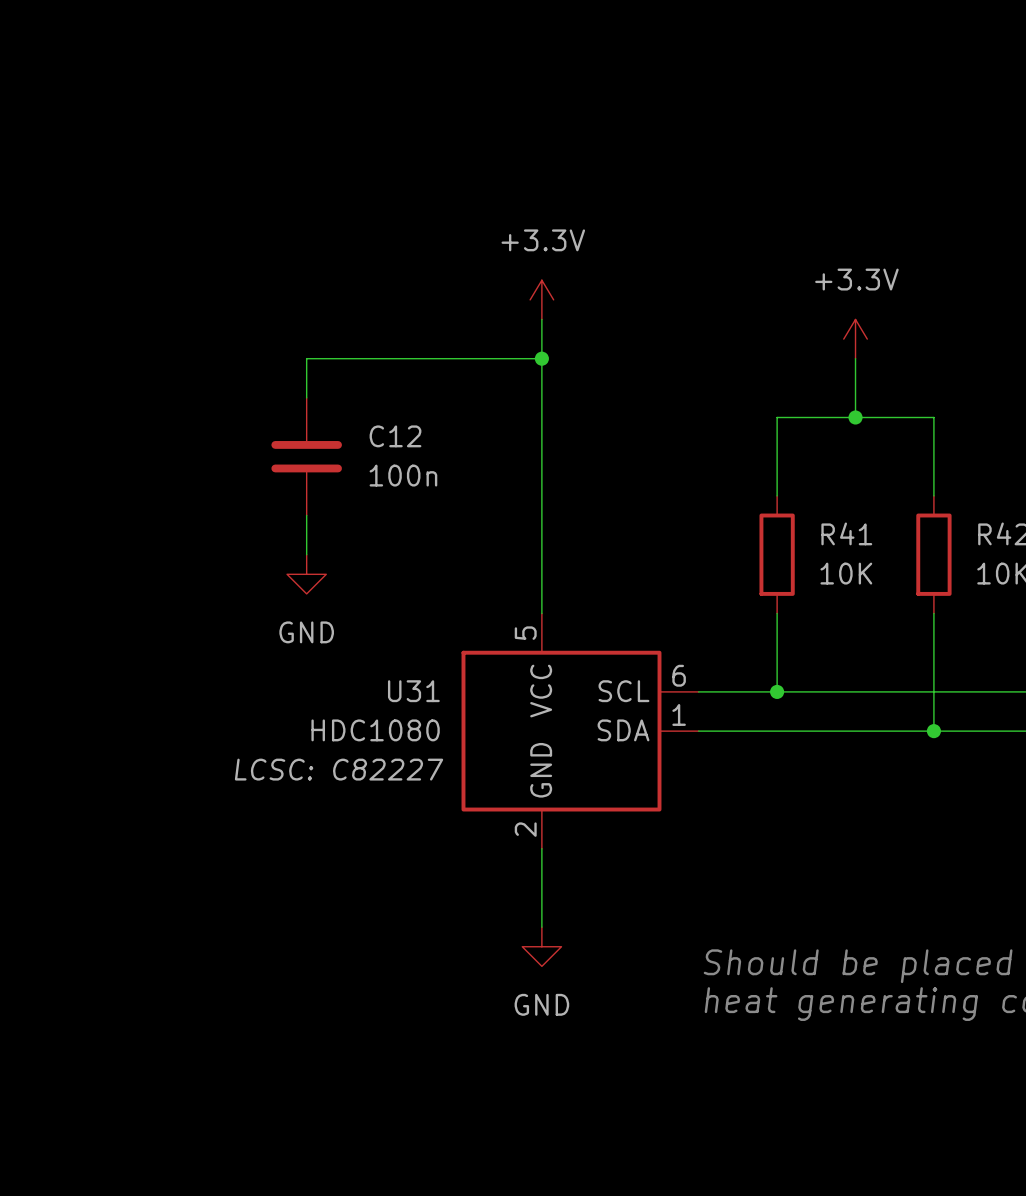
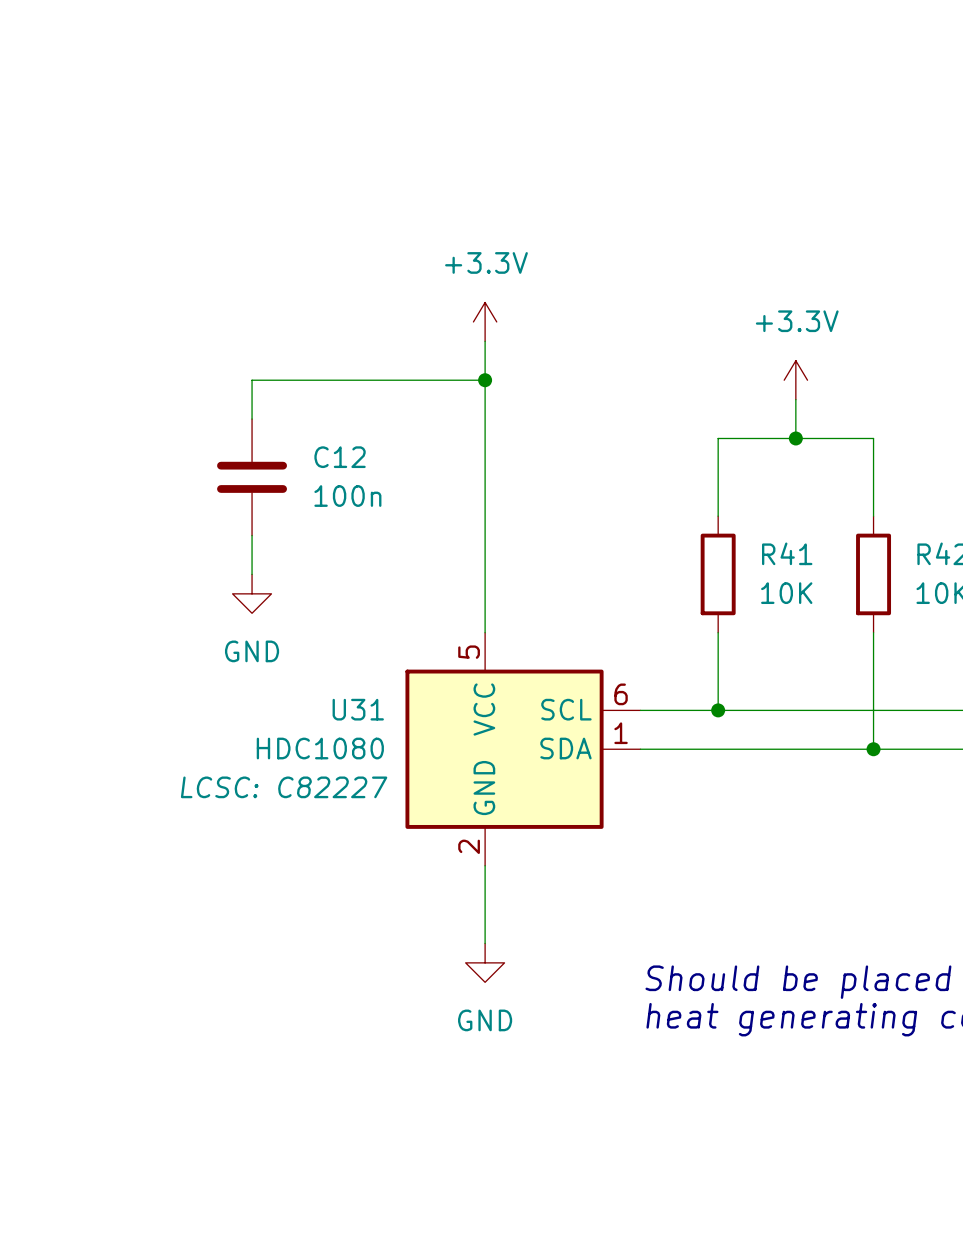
power symbol position: +3.3V (855, 339) -> +3.3V (795, 380)

